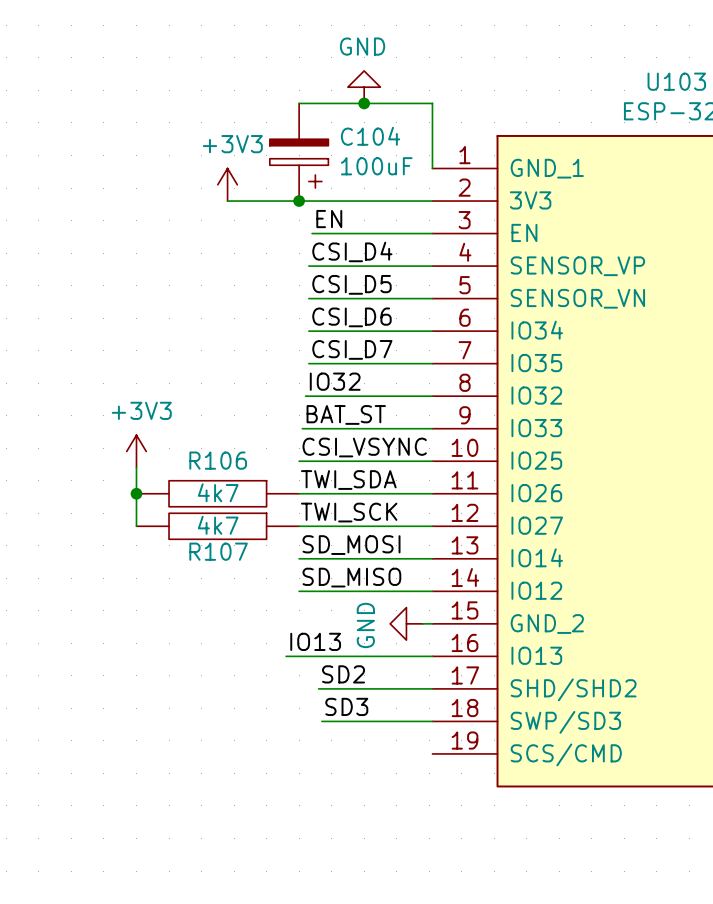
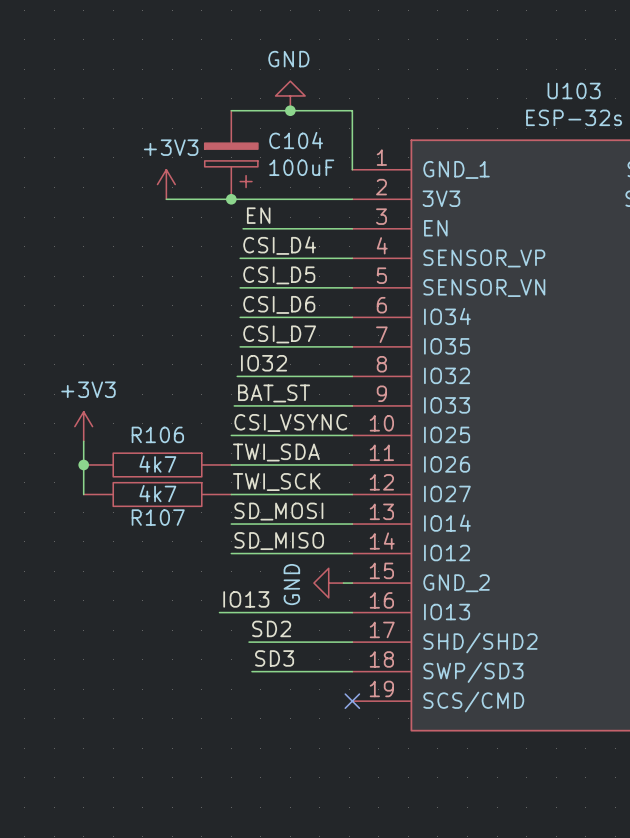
no-connect mark: none -> (352, 701)

